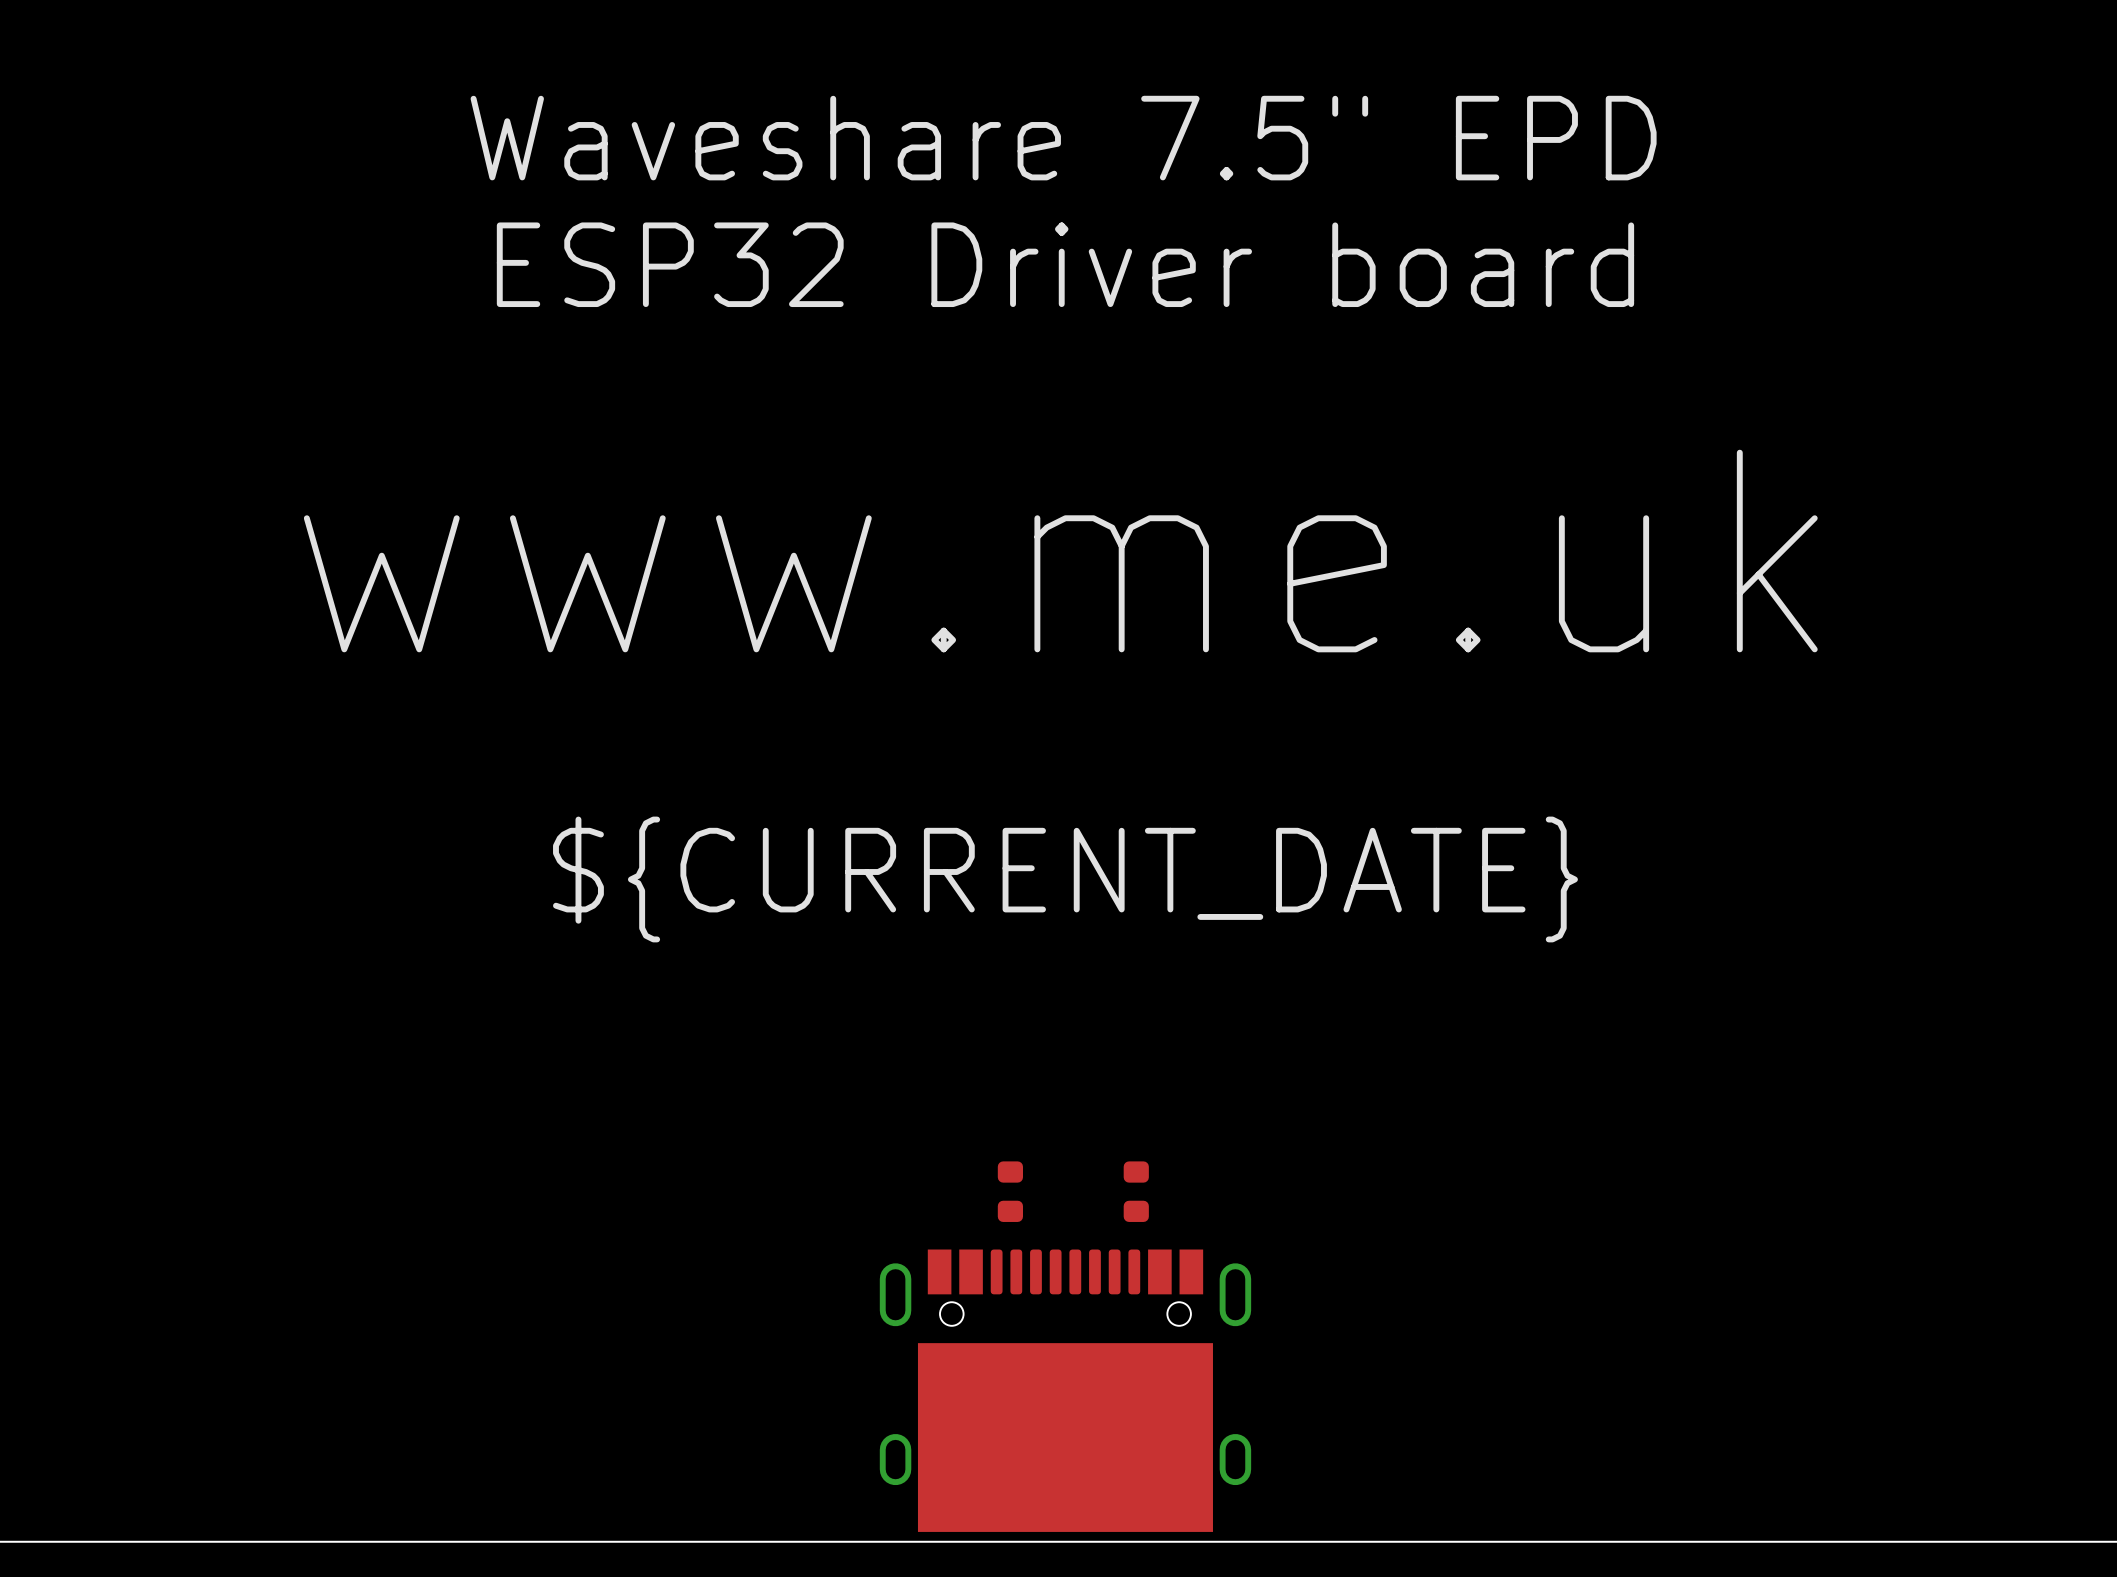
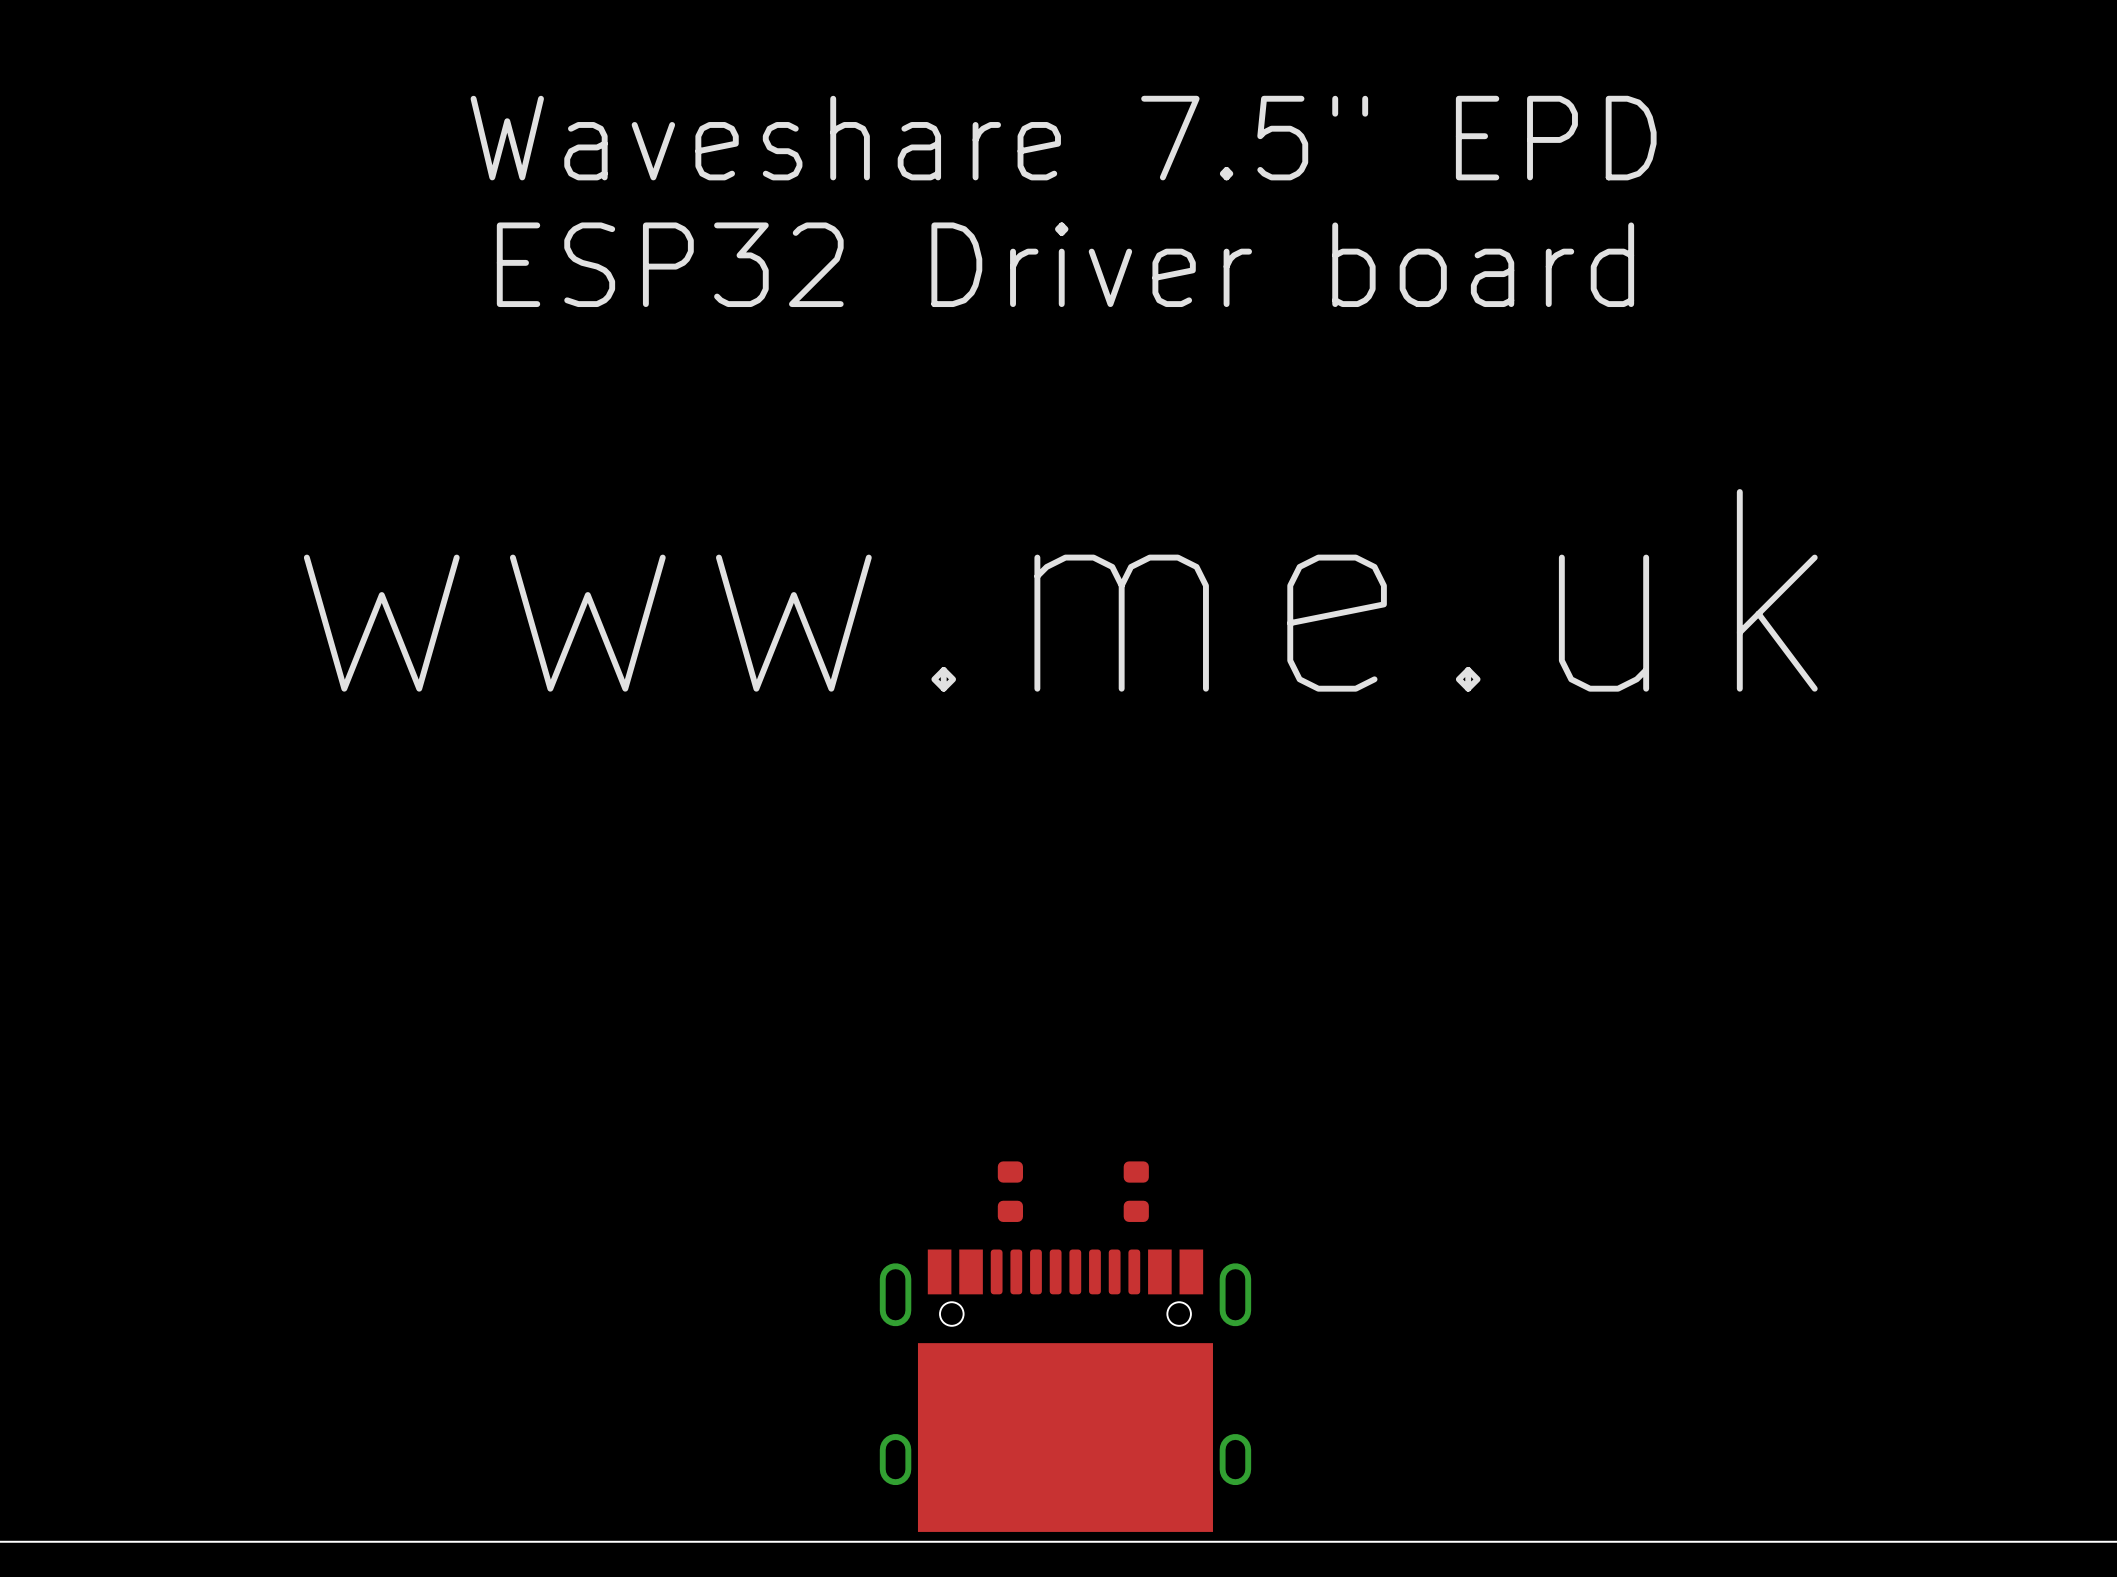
text position: www.me.uk (1060, 551) -> www.me.uk (1060, 590)
text: ${CURRENT_DATE} (1065, 879) -> none

